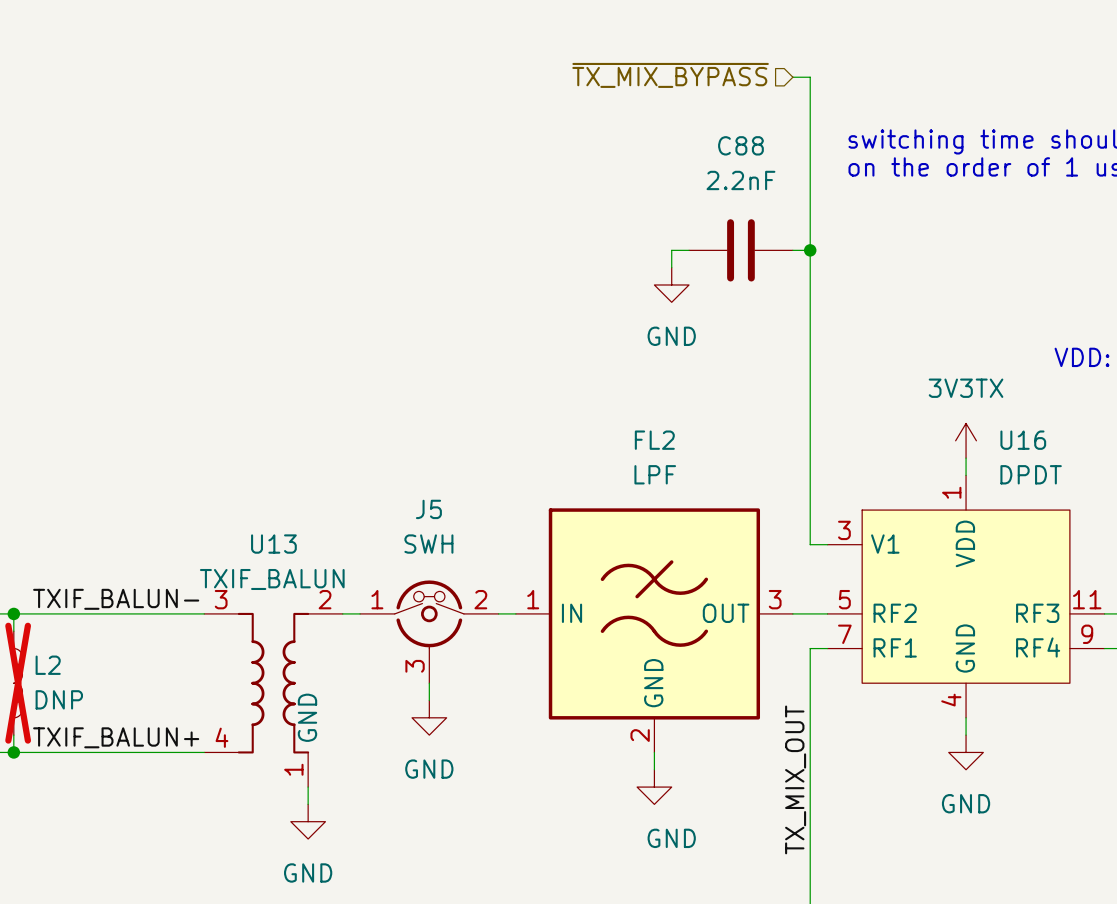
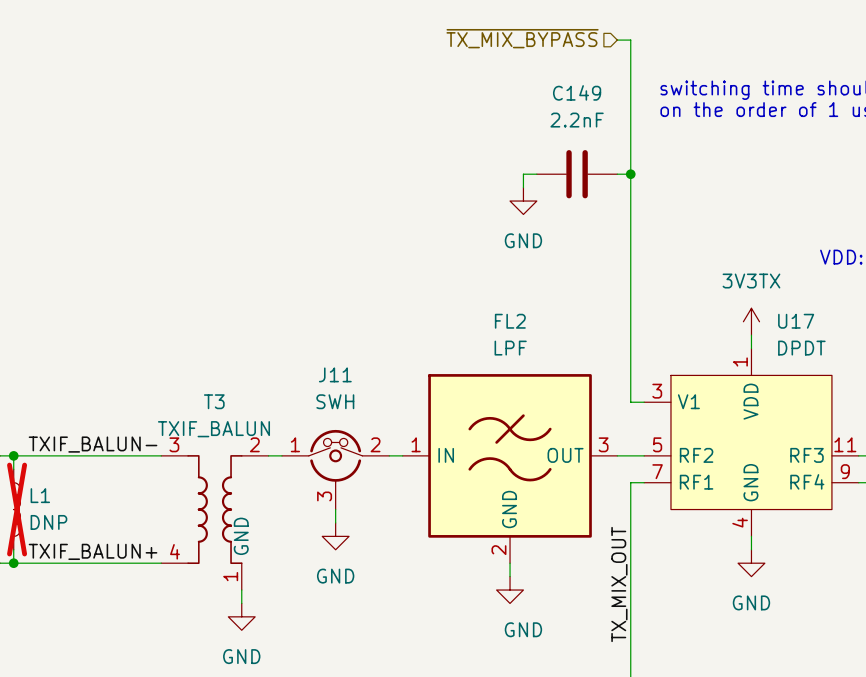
C88 name: C88 (740, 145) -> C149 (577, 92)
U16 name: U16 (1023, 440) -> U17 (796, 321)
J5 name: J5 (428, 509) -> J11 (335, 374)
U13 name: U13 (273, 544) -> T3 (214, 401)
L2 name: L2 (48, 665) -> L1 (40, 495)

